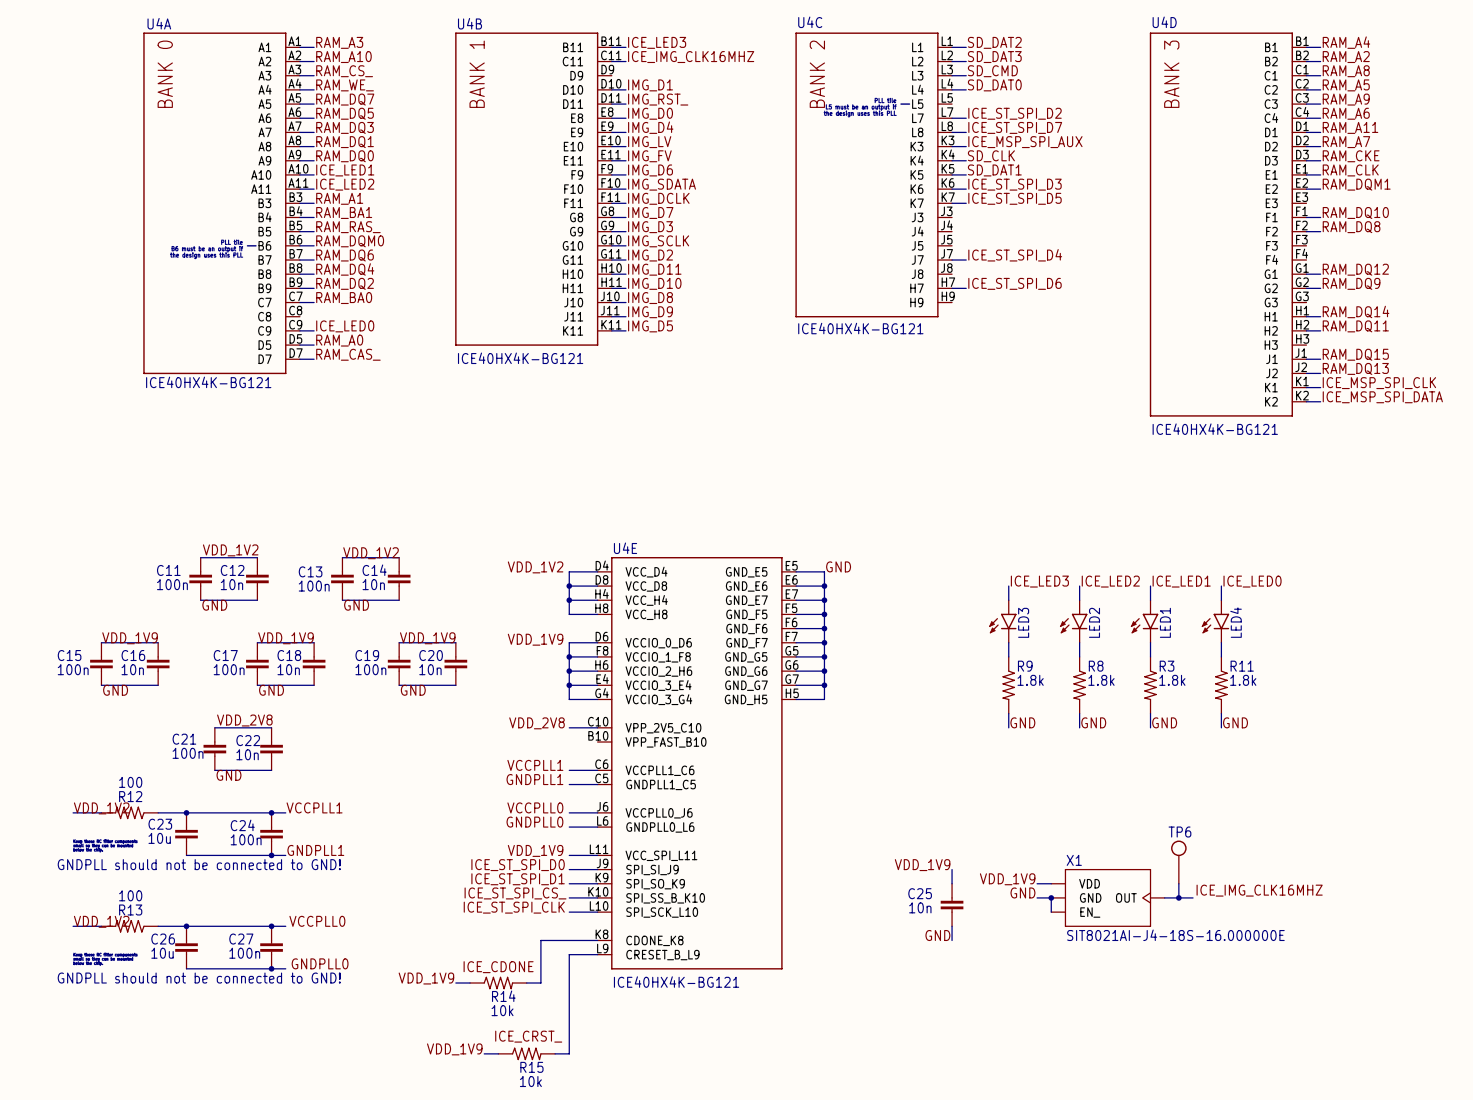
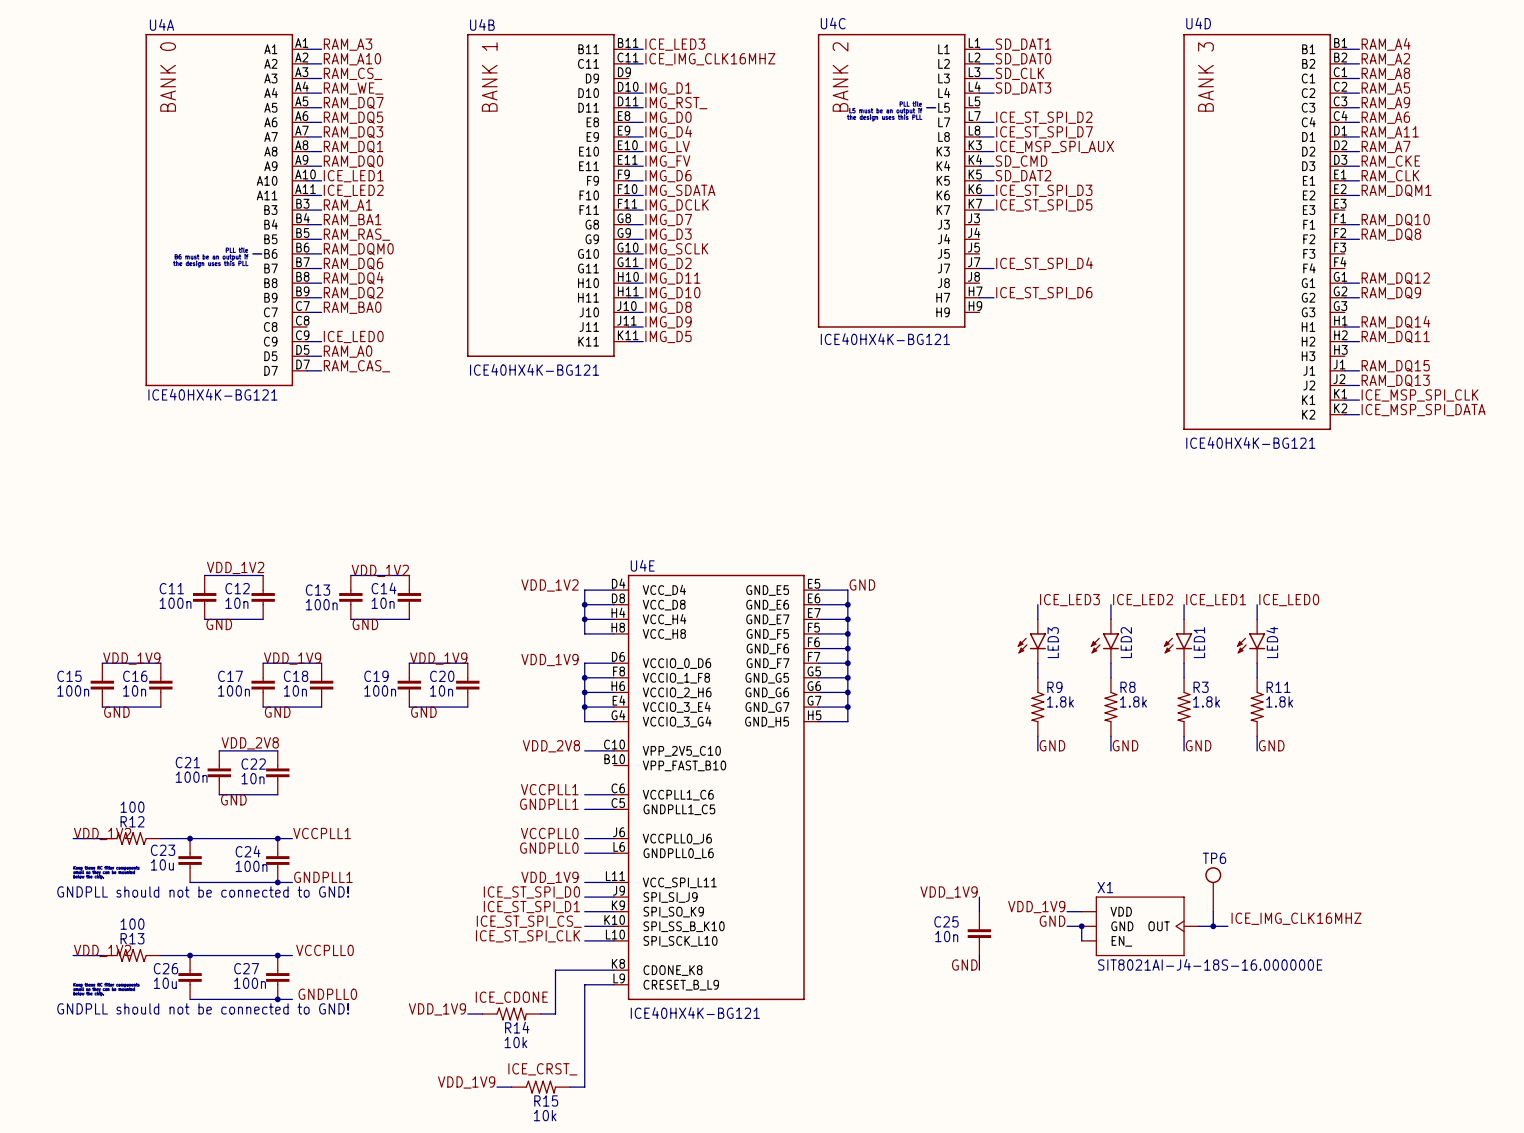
label: SD_DAT2 (994, 42) -> SD_DAT1 (1023, 44)
label: SD_DAT3 (994, 57) -> SD_DAT0 (1023, 59)
label: SD_CMD (992, 71) -> SD_CLK (1019, 73)
label: SD_DAT0 (994, 85) -> SD_DAT3 (1023, 88)
label: SD_CLK (991, 156) -> SD_CMD (1021, 161)
label: SD_DAT1 (994, 170) -> SD_DAT2 (1023, 176)

